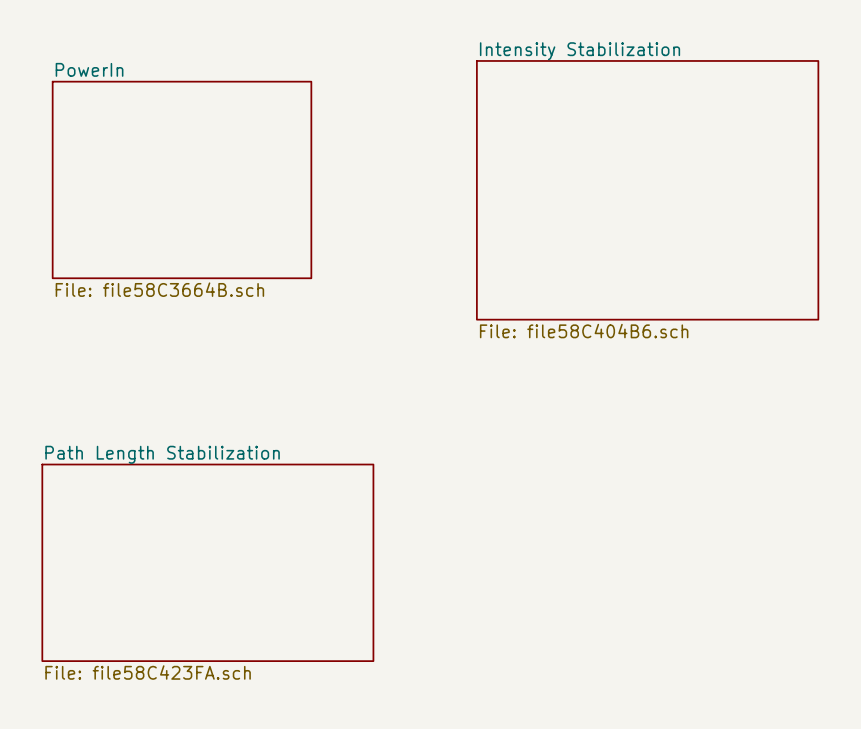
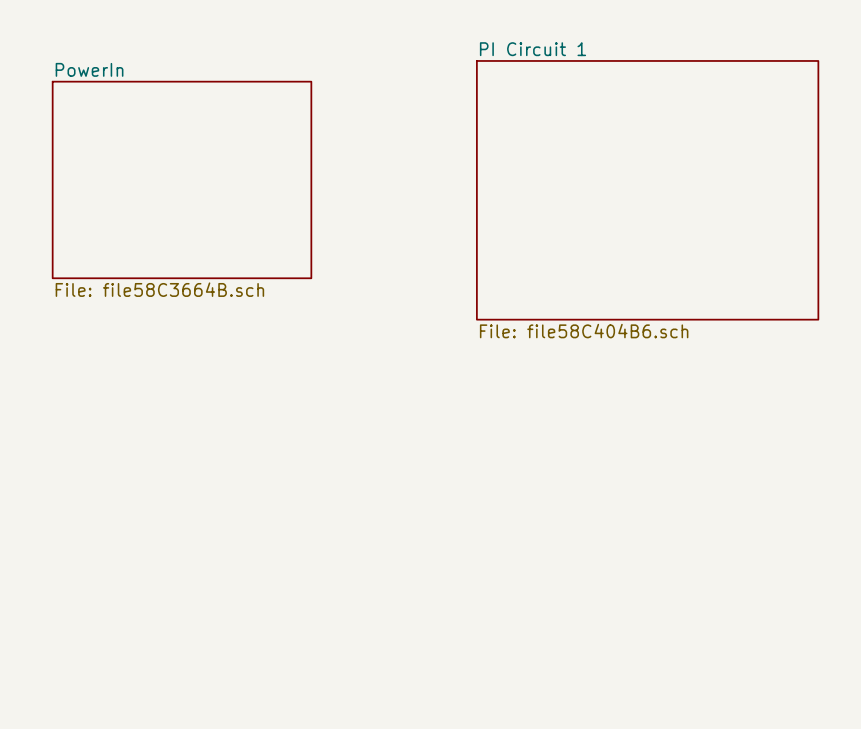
sheet Intensity Stabilization name: Intensity Stabilization (580, 51) -> PI Circuit 1 (533, 49)
sheet Path Length Stabilization: File: file58C423FA.sch (207, 562) -> none

